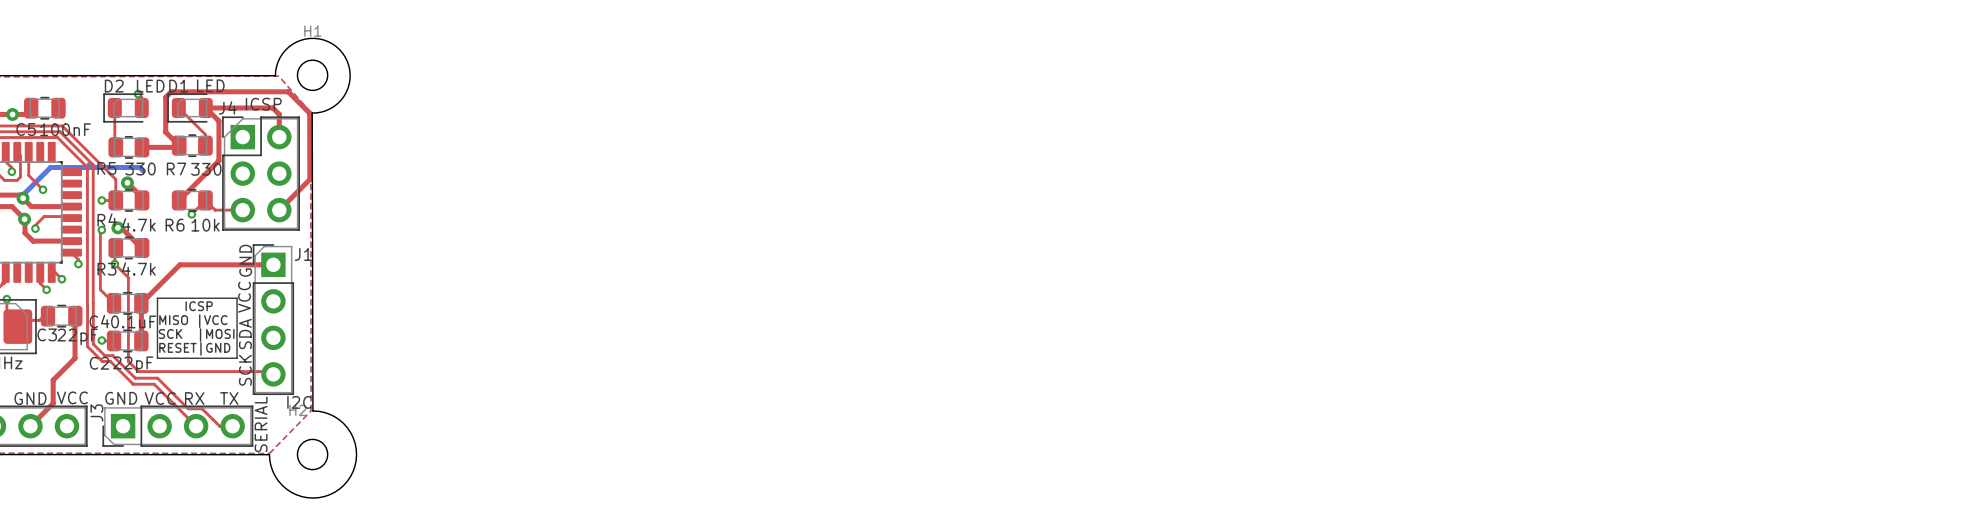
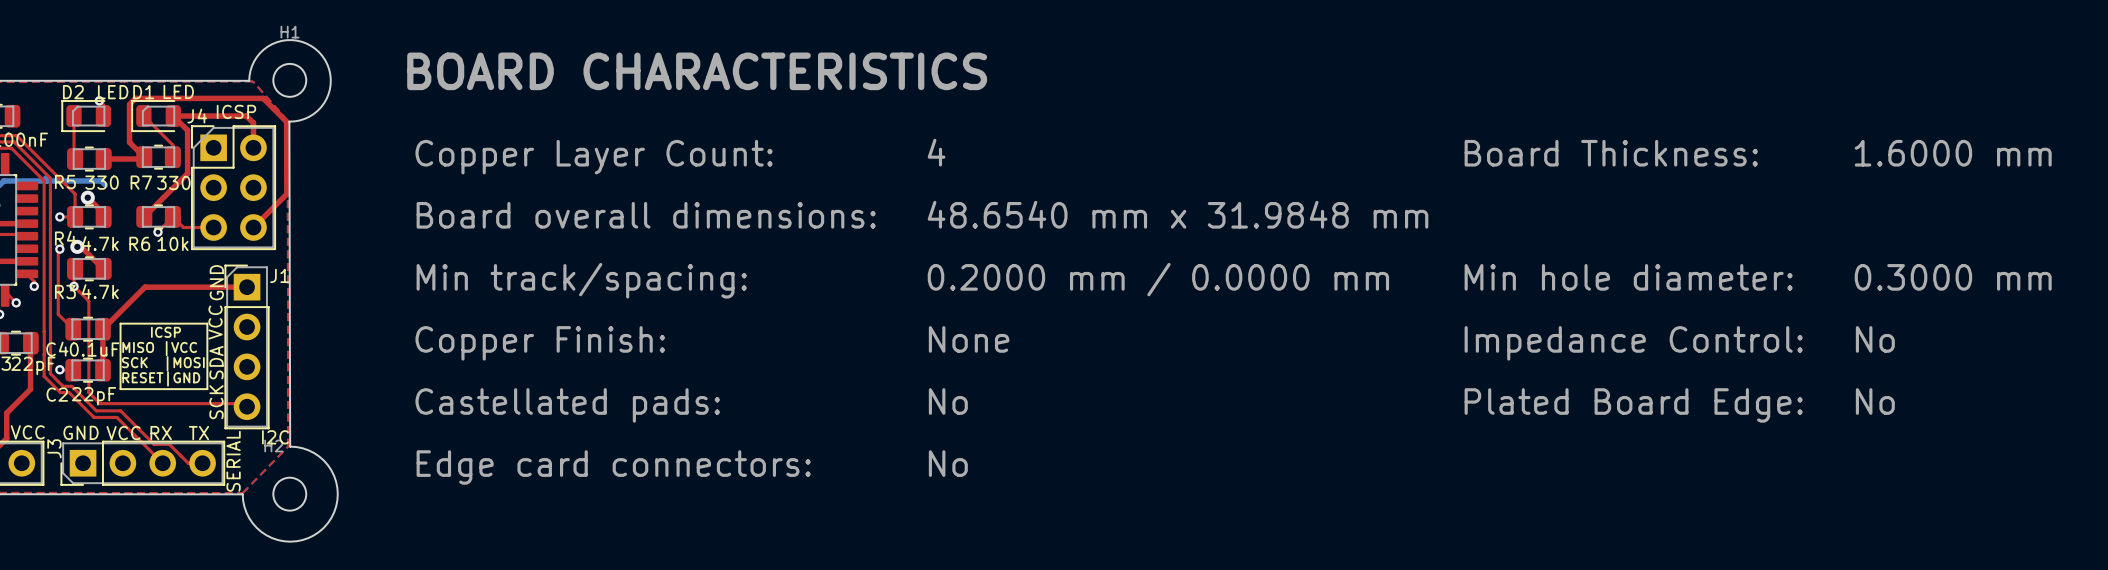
text: none -> BOARD CHARACTERISTICS (697, 71)
text: none -> 4 (936, 152)
text: none -> Board Thickness: (1611, 153)
text: none -> 1.6000 mm (1953, 153)
text: none -> Copper Layer Count: (594, 157)
text: none -> Board overall dimensions: (646, 215)
text: none -> 48.6540 mm x 31.9848 mm (1178, 214)
text: none -> Min hole diameter: (1628, 277)
text: none -> 0.3000 mm (1953, 277)
text: none -> 0.2000 mm / 0.0000 mm (1158, 279)
text: none -> Min track/spacing: (581, 280)
text: none -> None (969, 339)
text: none -> No (1875, 339)
text: none -> Copper Finish: (540, 343)
text: none -> Impedance Control: (1633, 343)
text: none -> No (948, 401)
text: none -> No (1875, 401)
text: none -> Castellated pads: (567, 405)
text: none -> Plated Board Edge: (1633, 405)
text: none -> No (948, 463)
text: none -> Edge card connectors: (613, 467)

